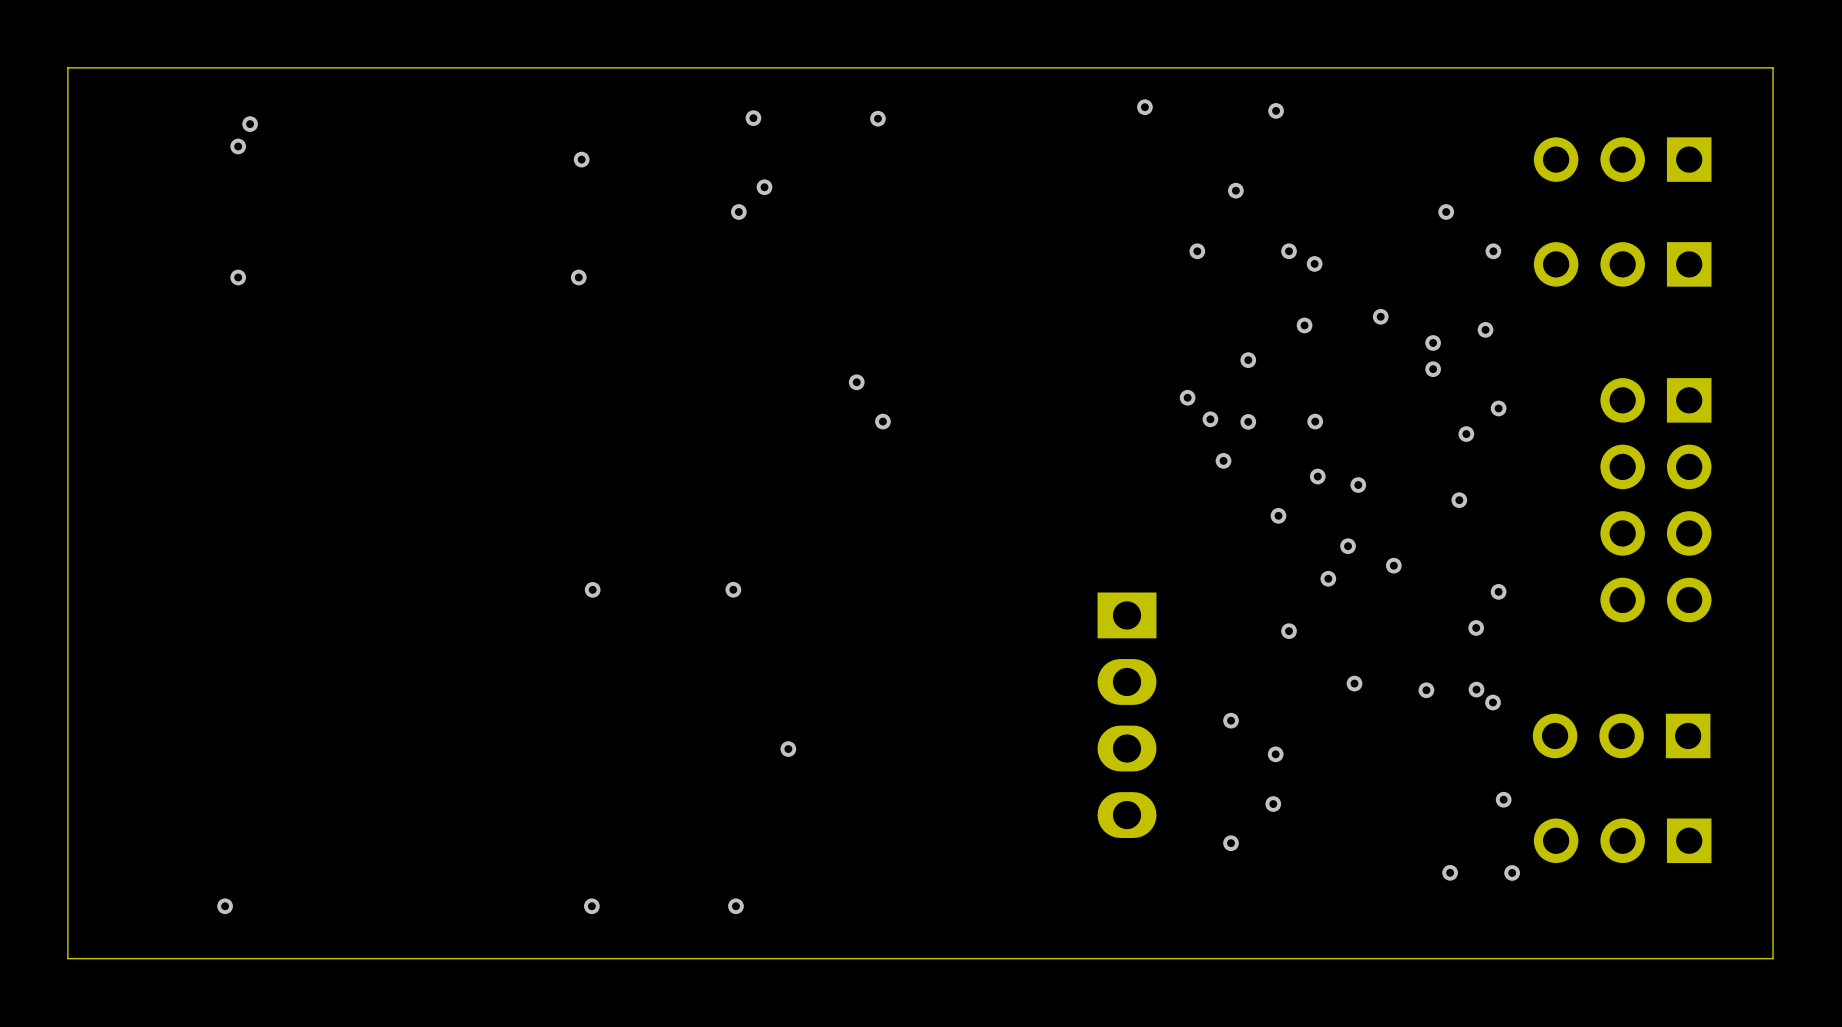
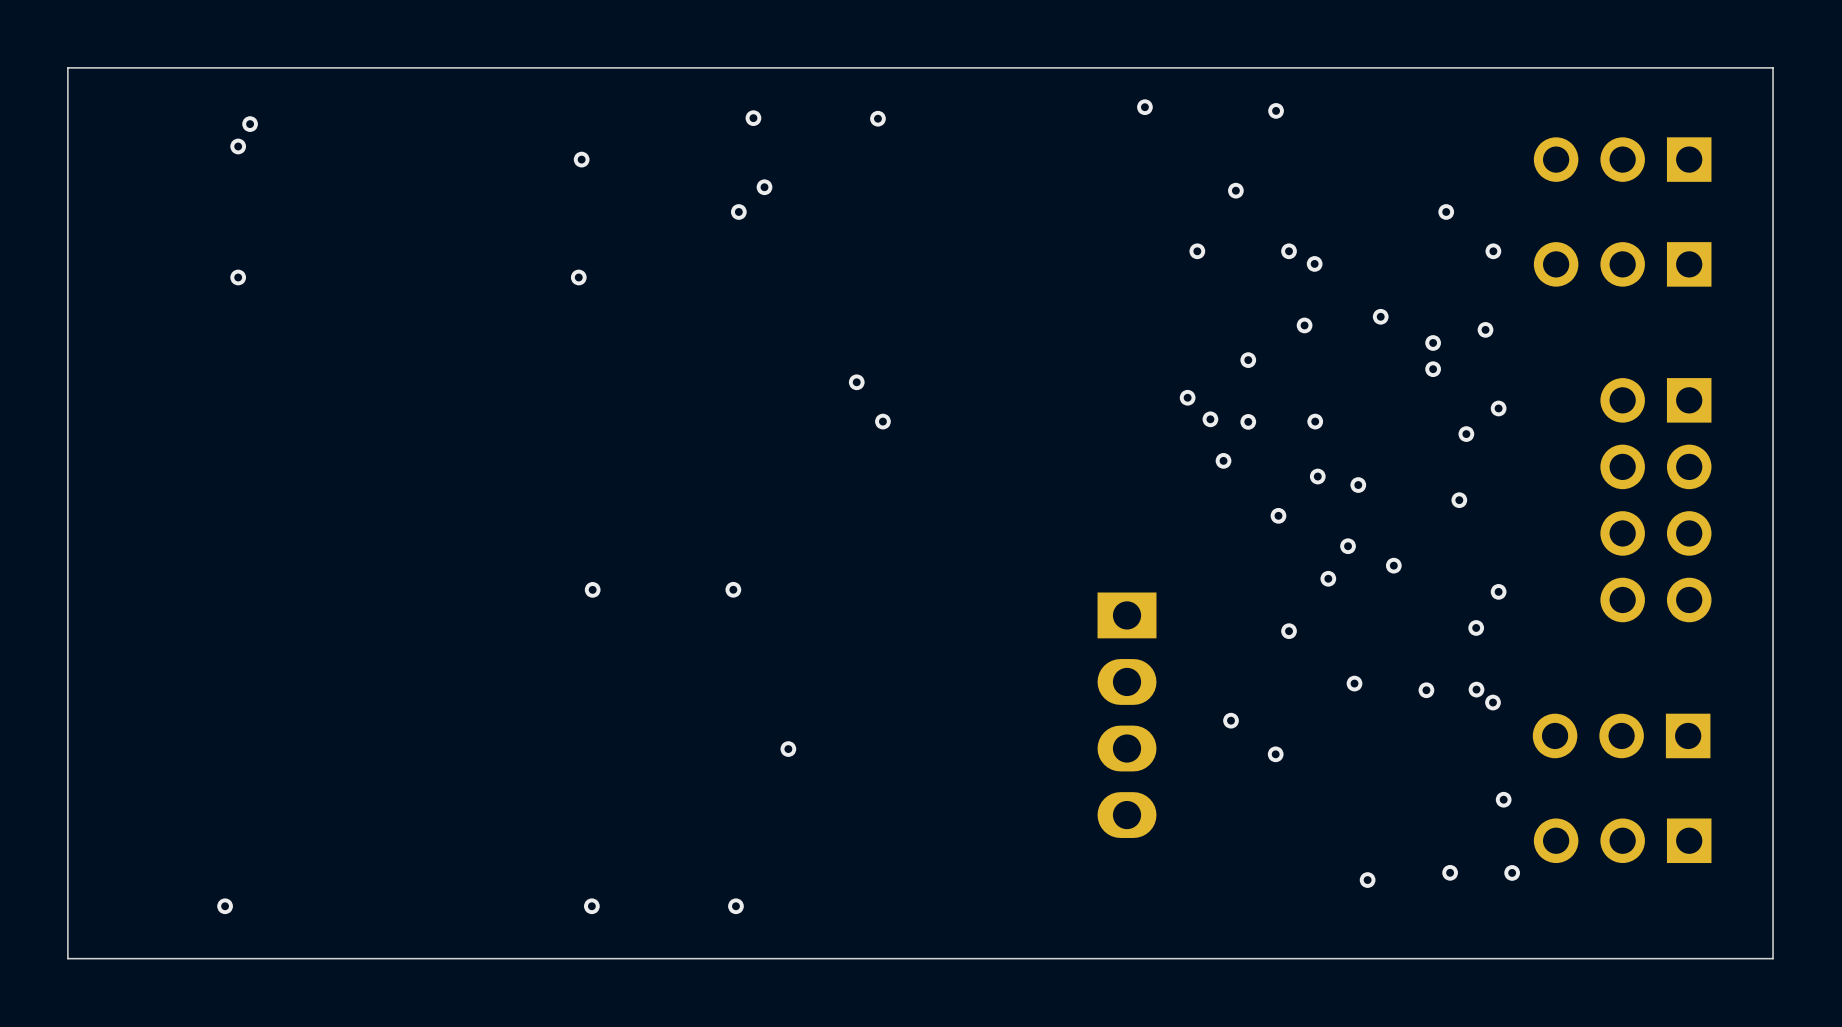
via: (1273, 804) -> none
via: (1231, 843) -> none
via: none -> (1367, 880)

